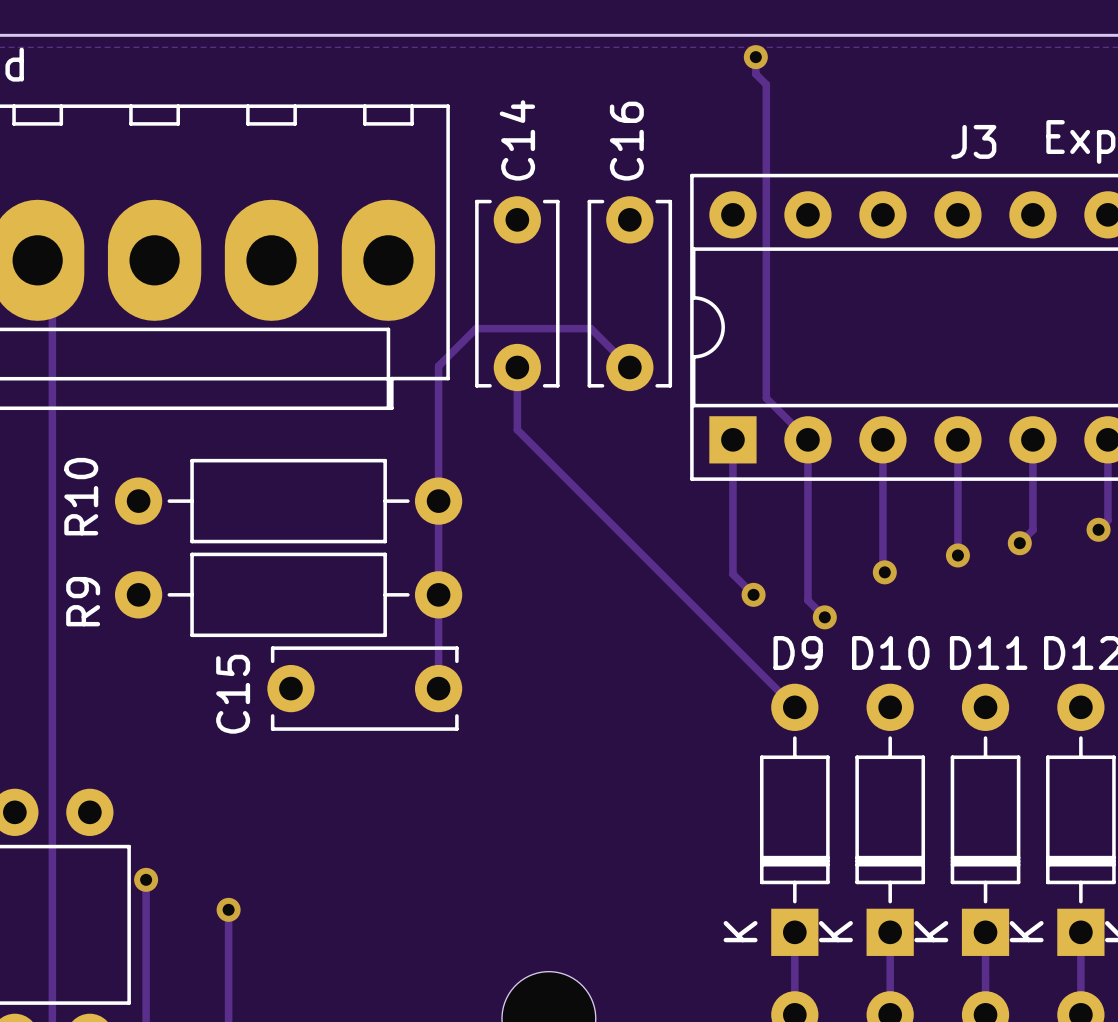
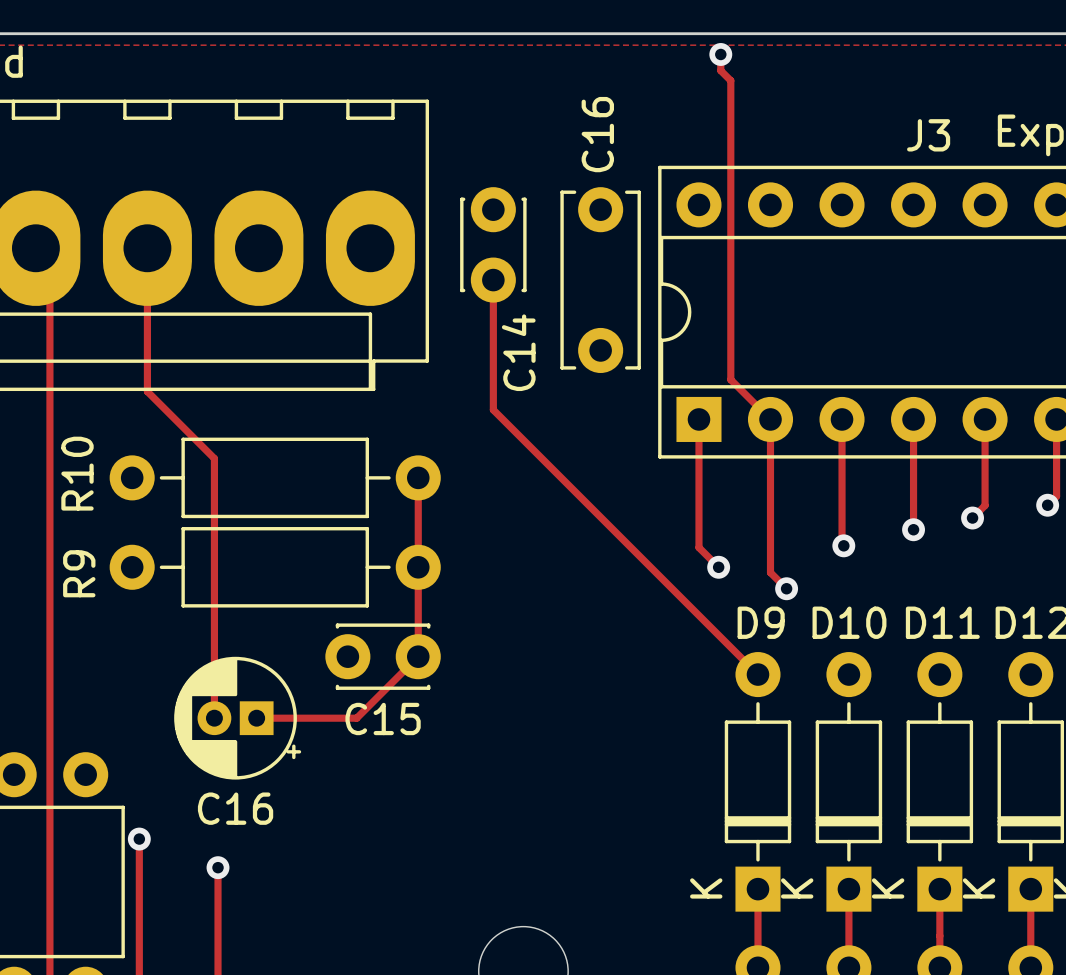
C14 name position: C14 (517, 140) -> C14 (518, 352)
C14 footprint: [475, 196, 560, 392] -> [460, 187, 527, 303]
track: none -> (147, 248) (147, 391) (214, 458) (214, 718)
track: none -> (493, 280) (493, 350)
track: (629, 367) (590, 328) (476, 328) (438, 366) (438, 501) -> none
C15 footprint: [267, 646, 463, 731] -> [325, 623, 441, 690]
track: none -> (418, 656) (356, 718) (256, 718)
C15 name position: C15 (233, 694) -> C15 (383, 718)
C16: none -> (237, 718)

